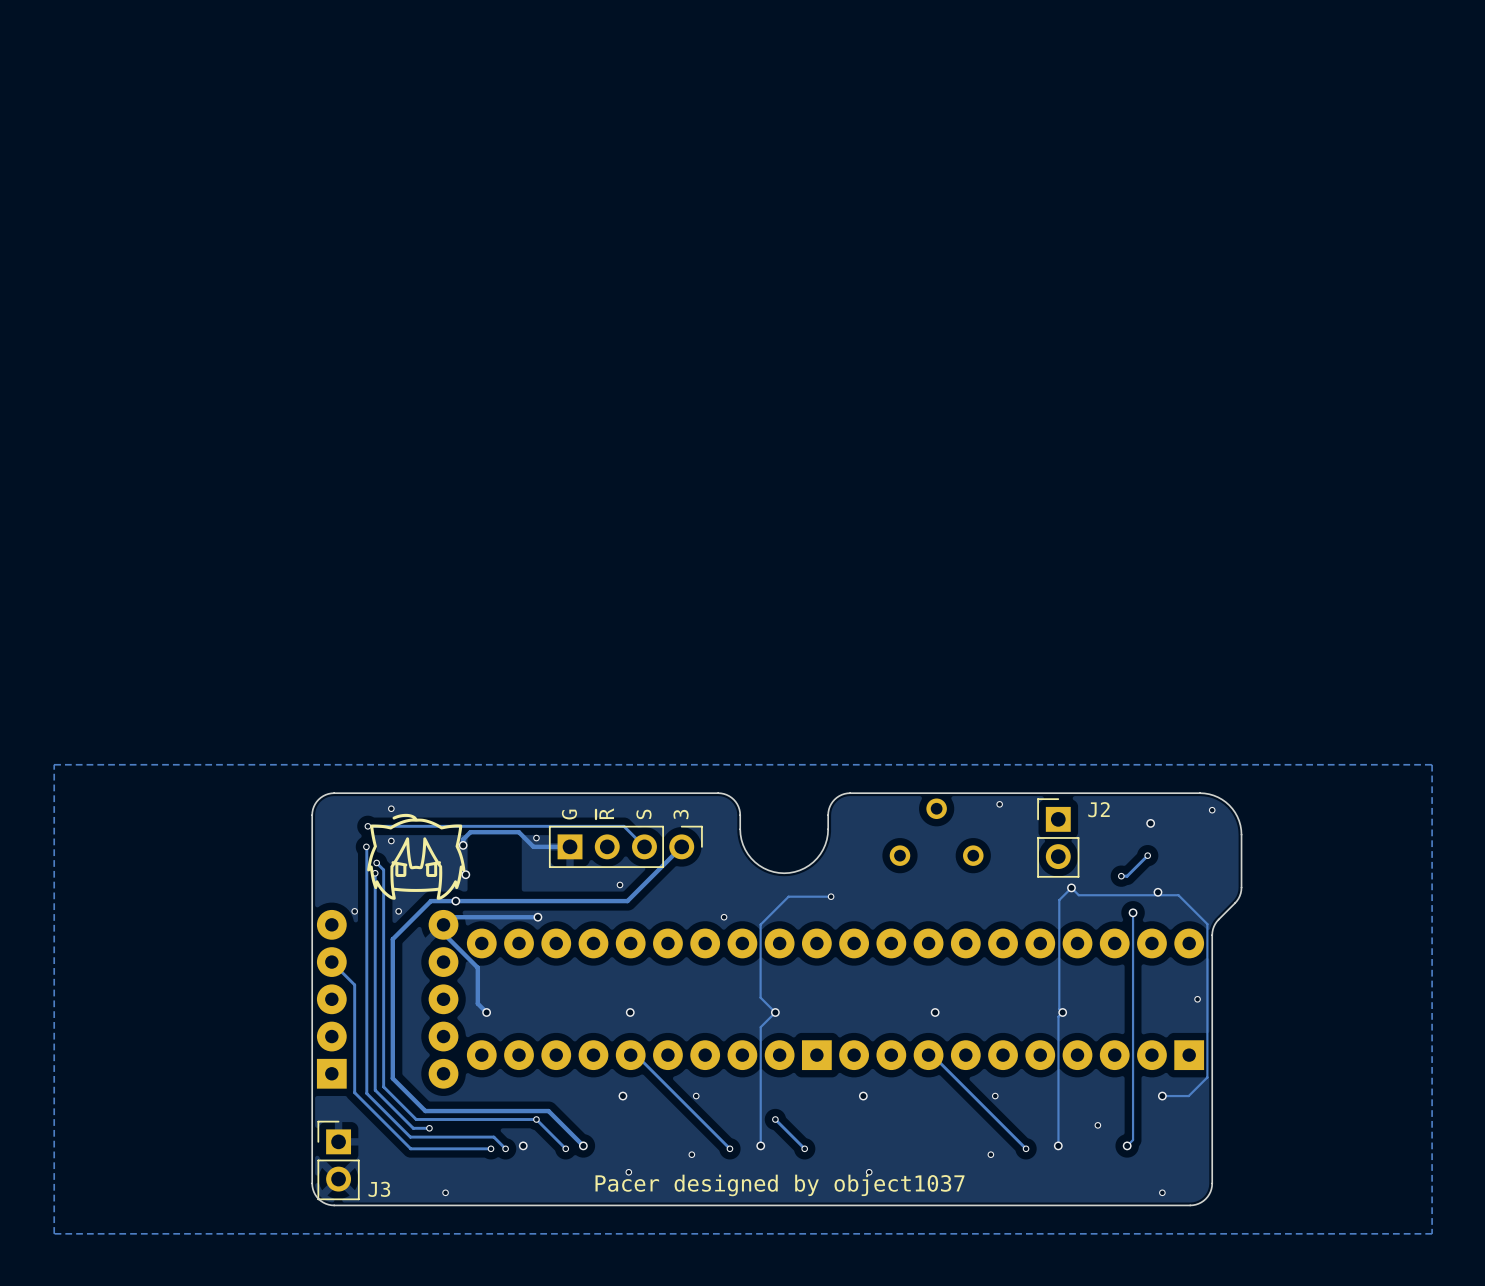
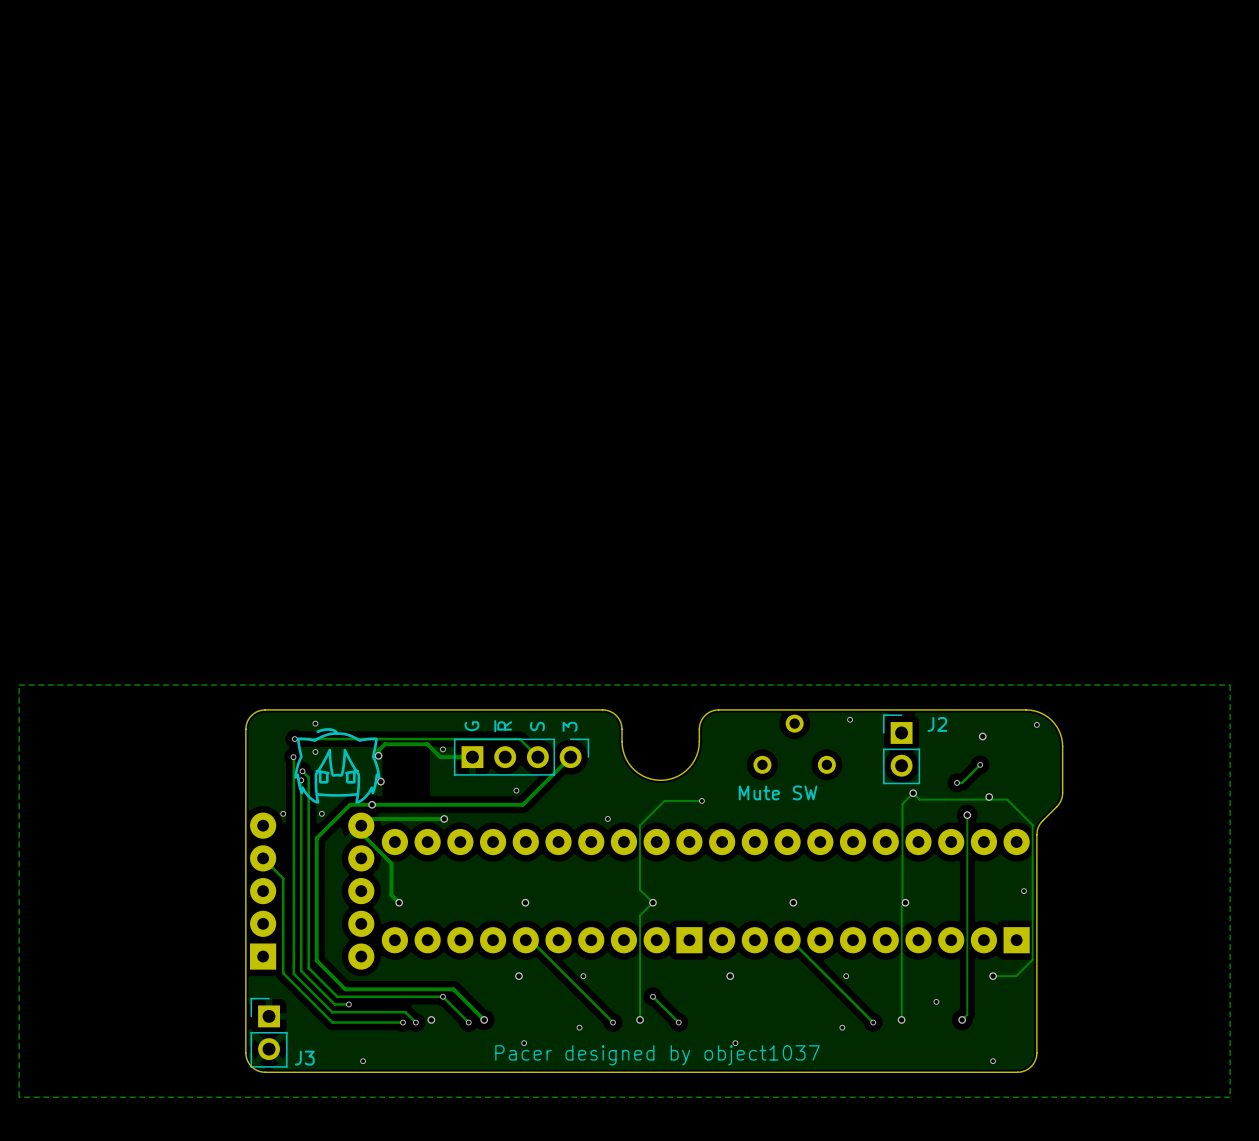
text: none -> Mute SW (778, 792)

